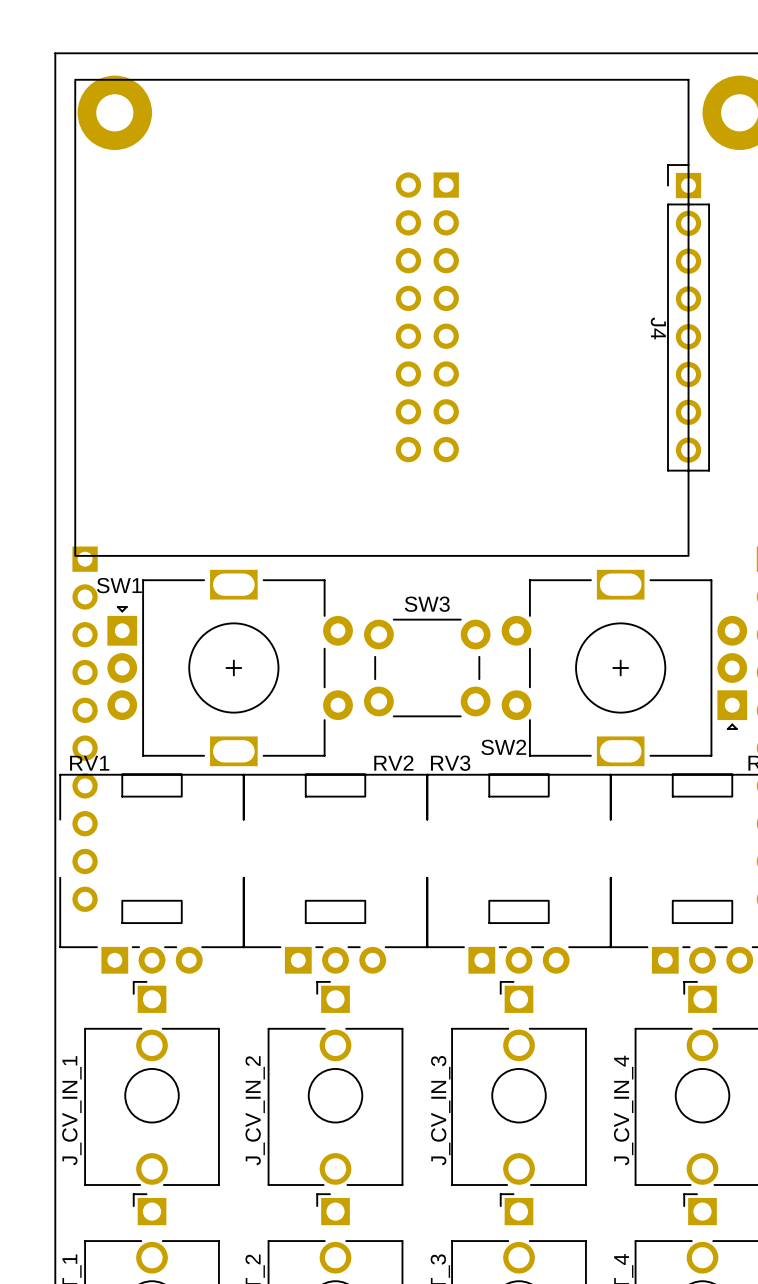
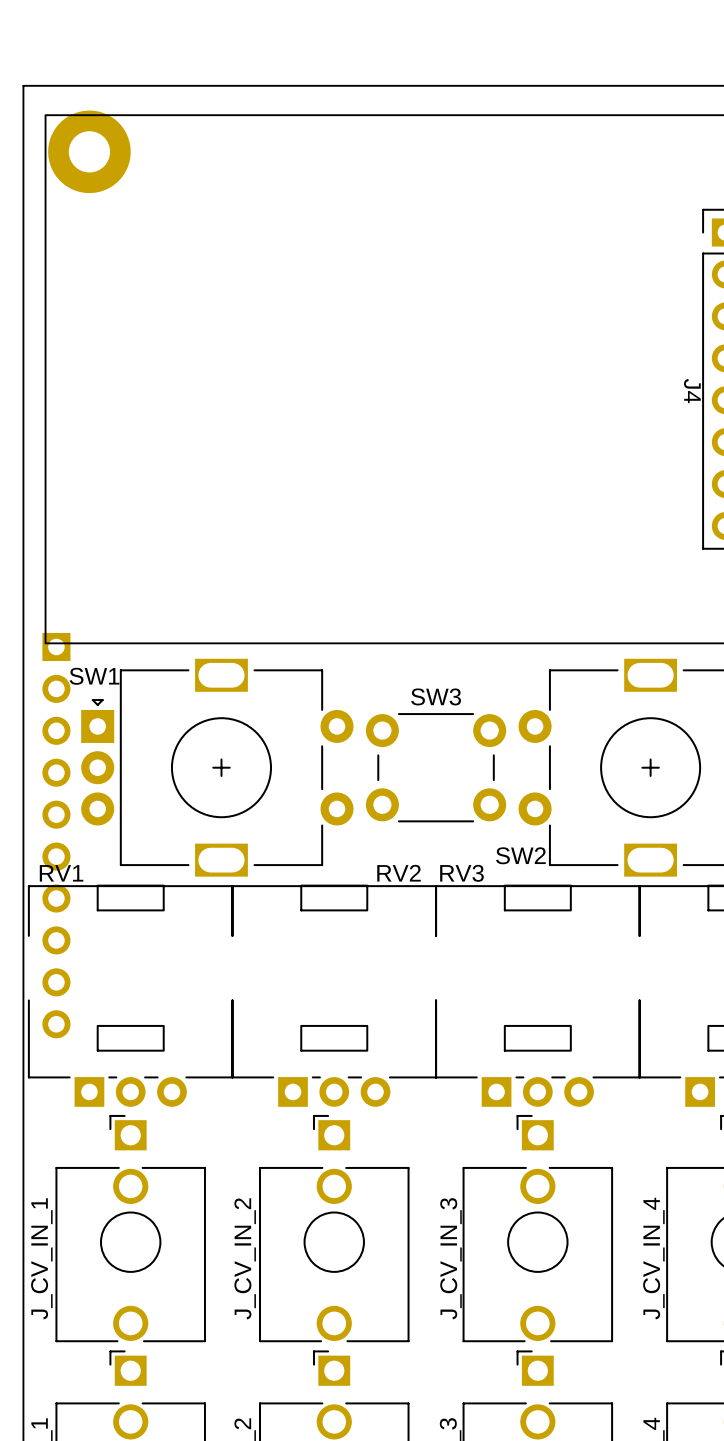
part: (427, 317) -> none

